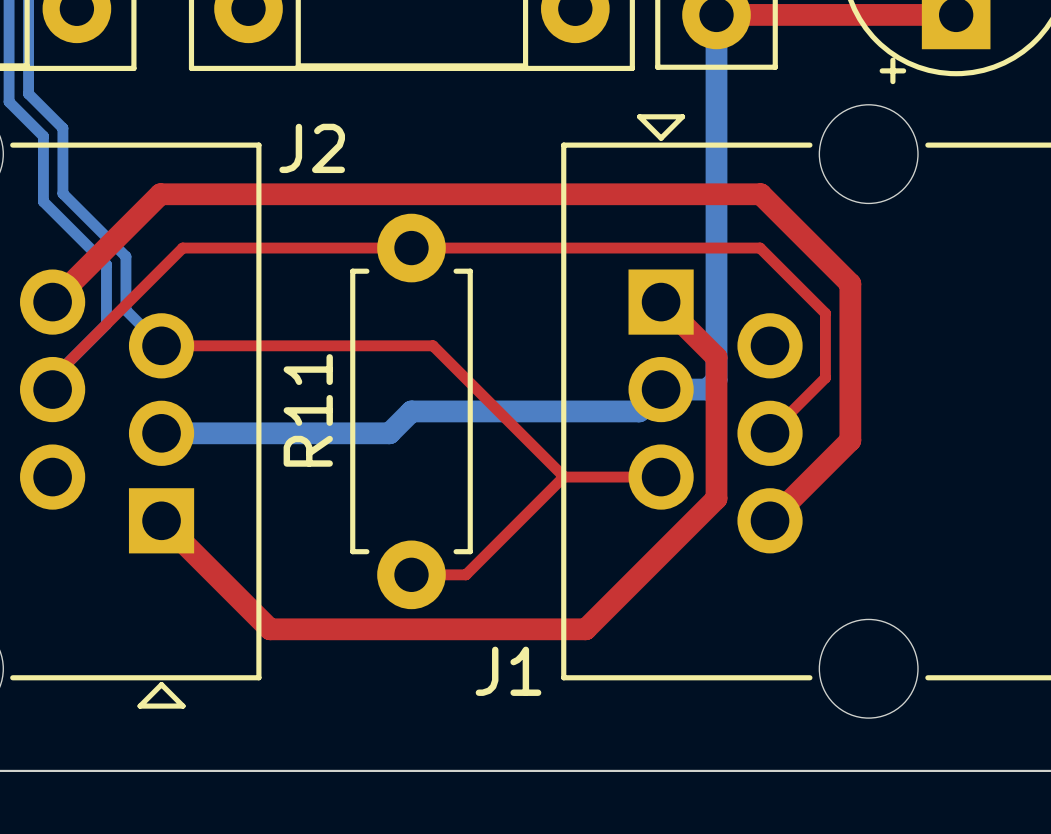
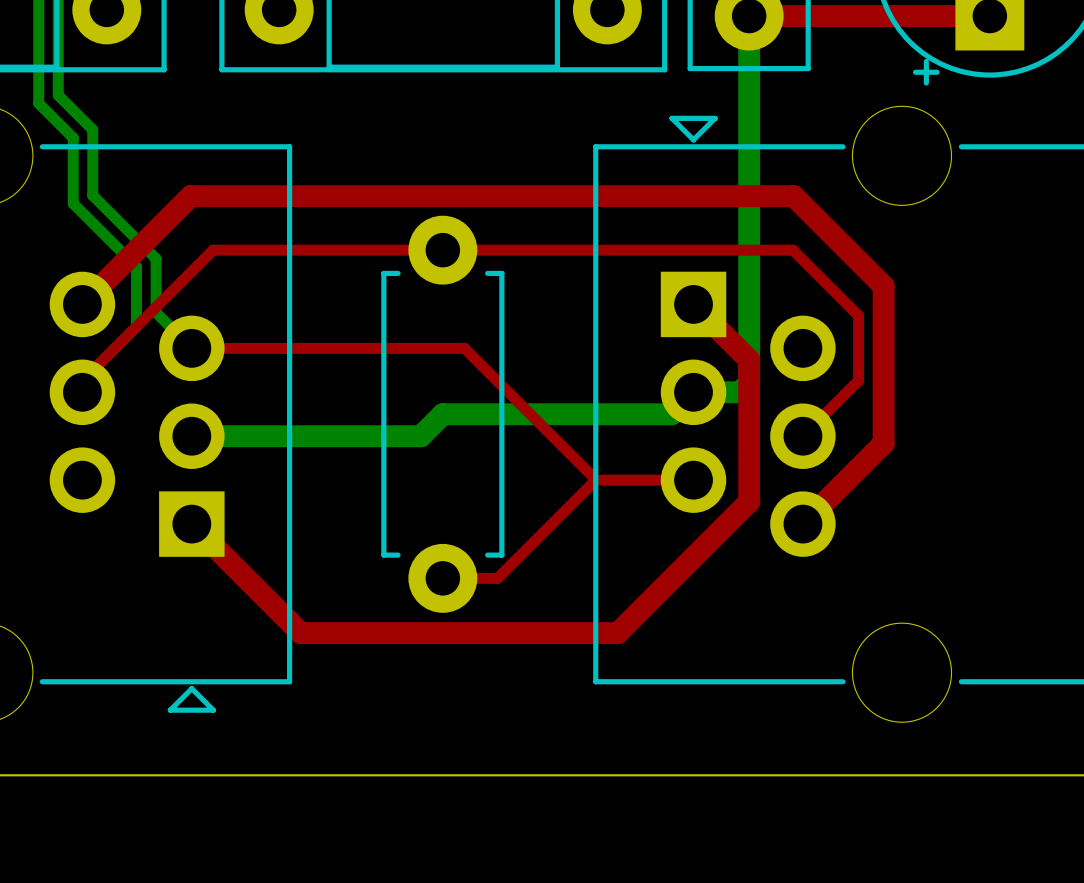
J2 name: J2 (312, 148) -> none
R11 name: R11 (308, 410) -> none
J1 name: J1 (508, 671) -> none

